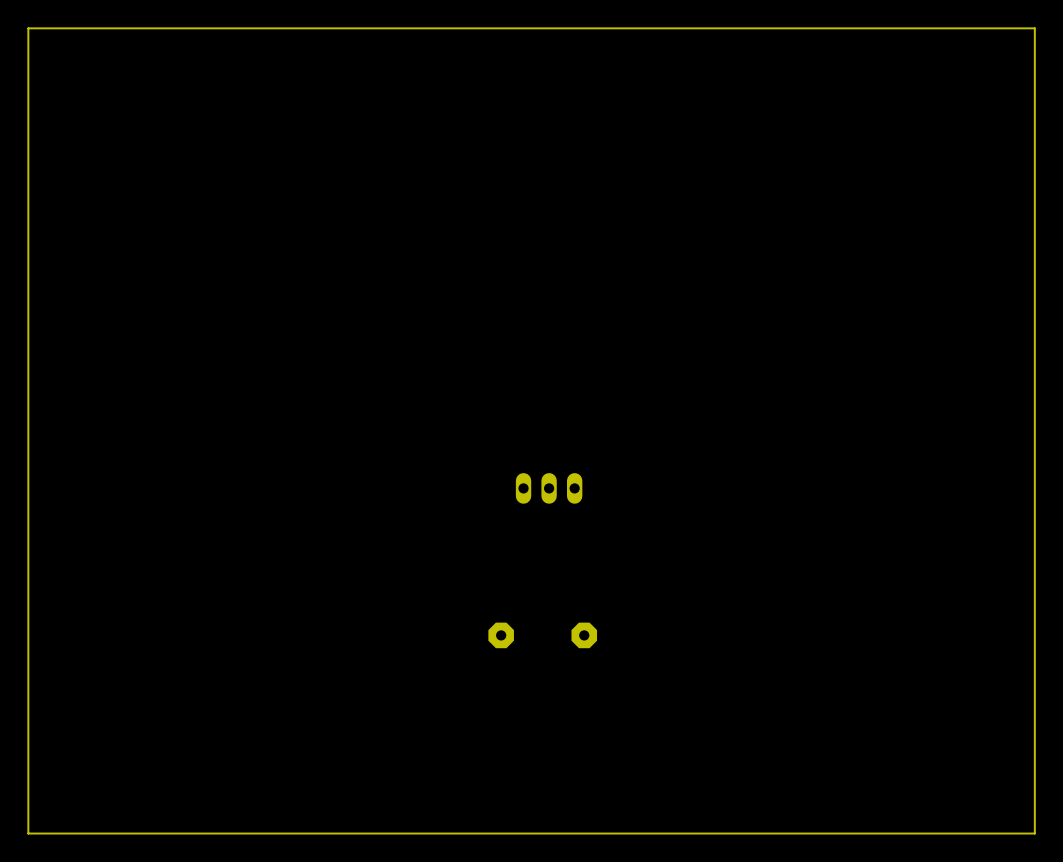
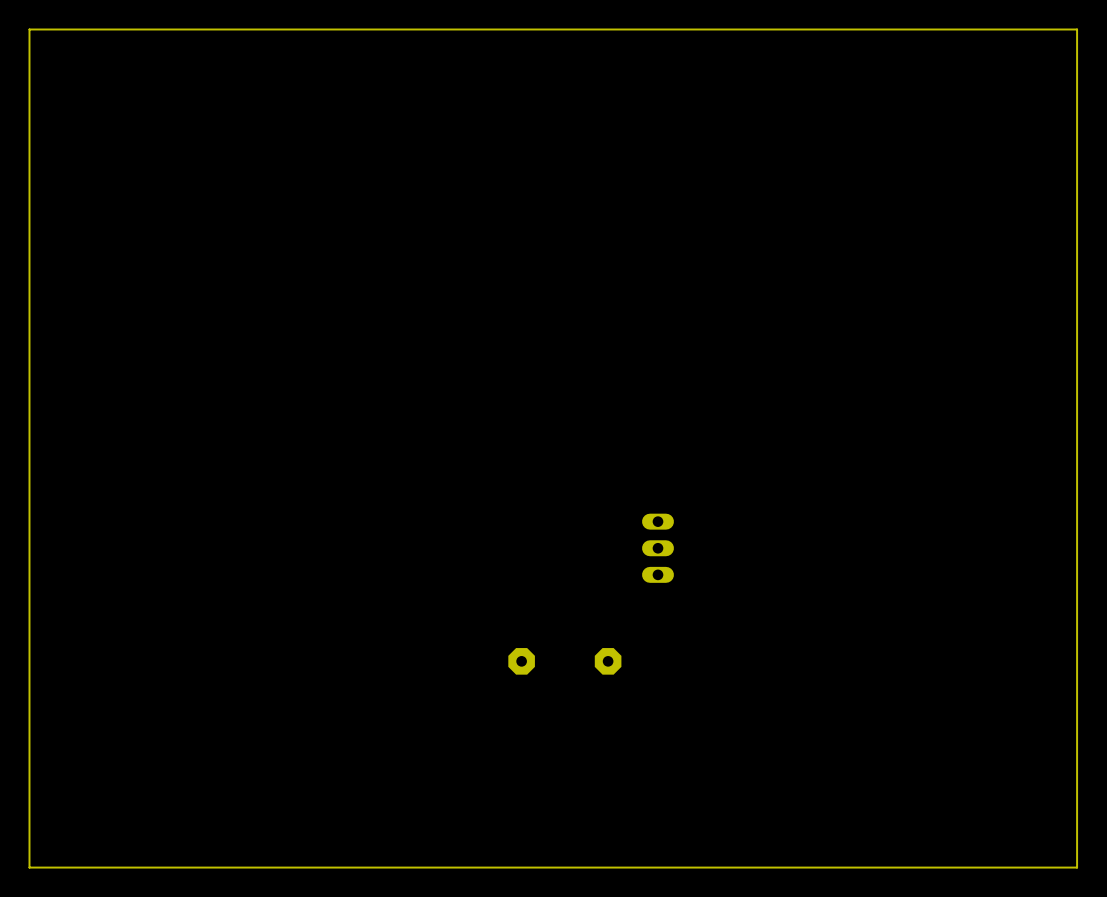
part rotation: 0° (549, 488) -> 90° clockwise (657, 548)
part position: (549, 488) -> (657, 548)

